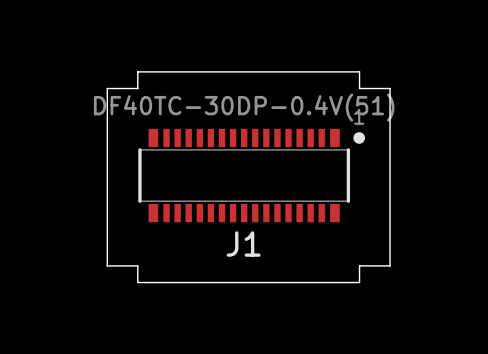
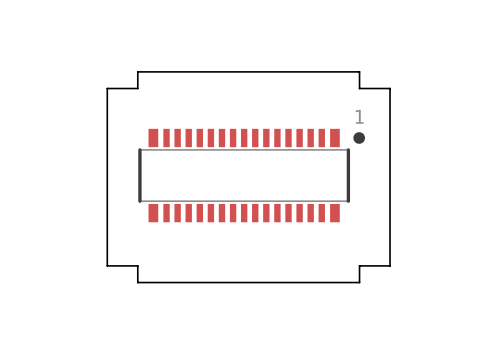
J1 value: DF40TC-30DP-0.4V(51) (244, 107) -> none
J1 name: J1 (243, 244) -> none

